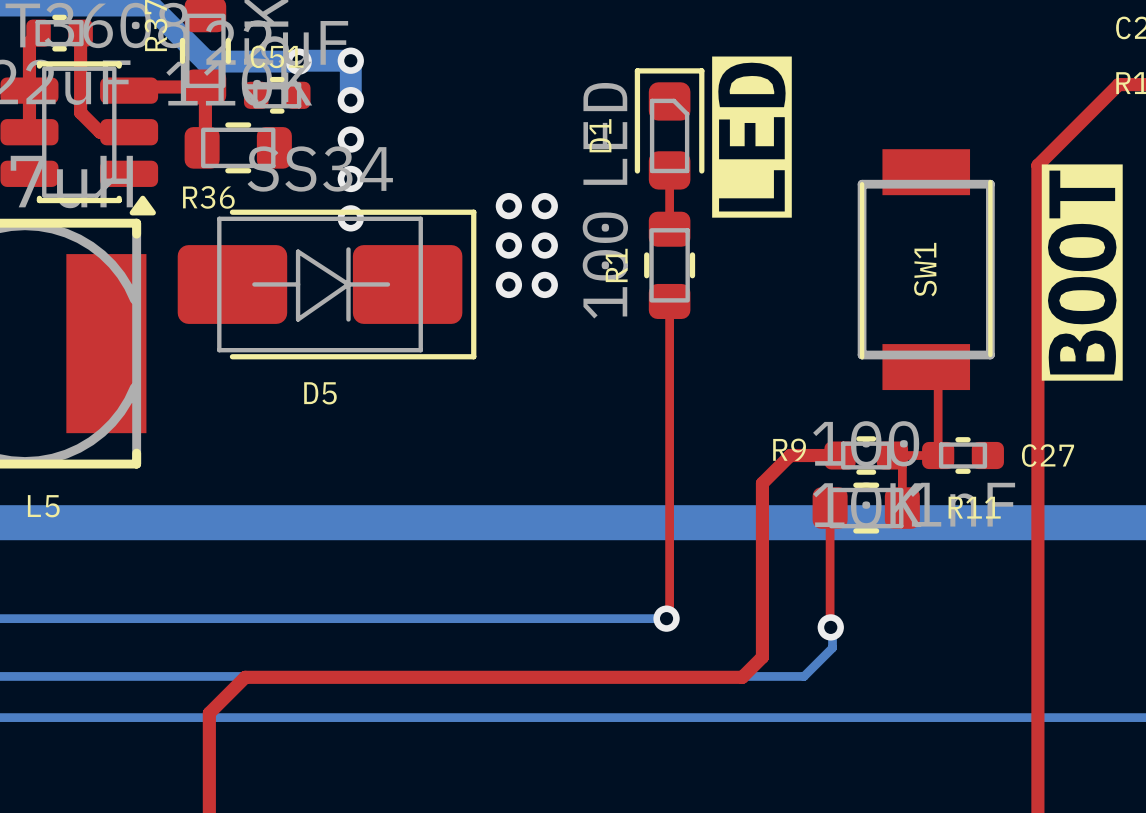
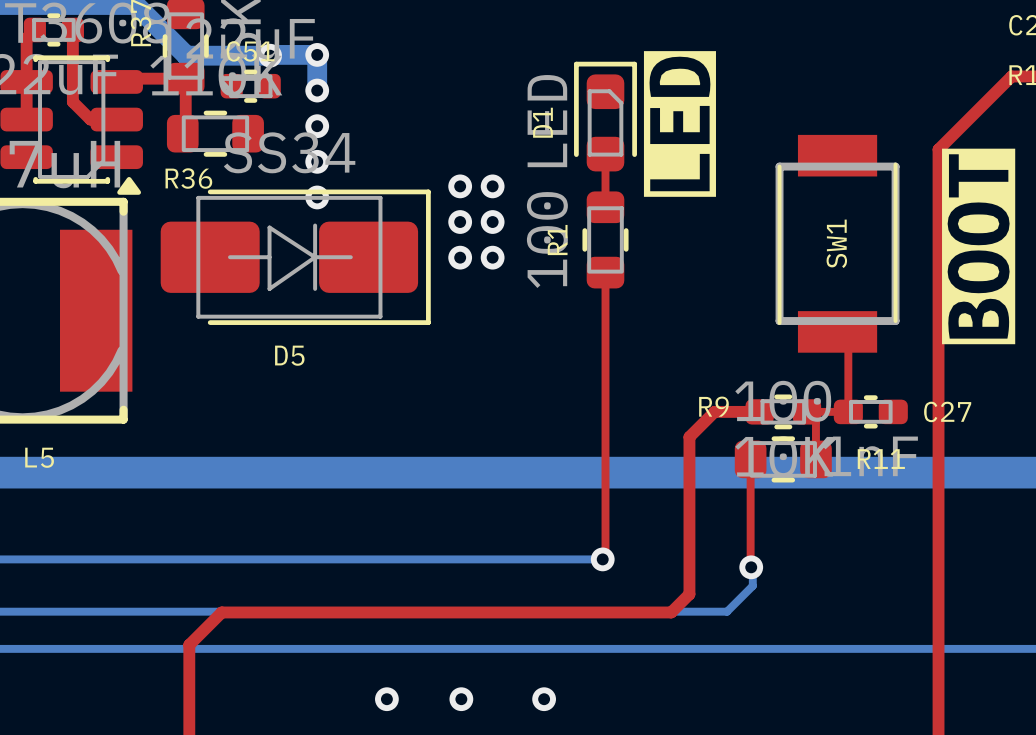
via: none -> (386, 699)
via: none -> (461, 699)
via: none -> (544, 699)

